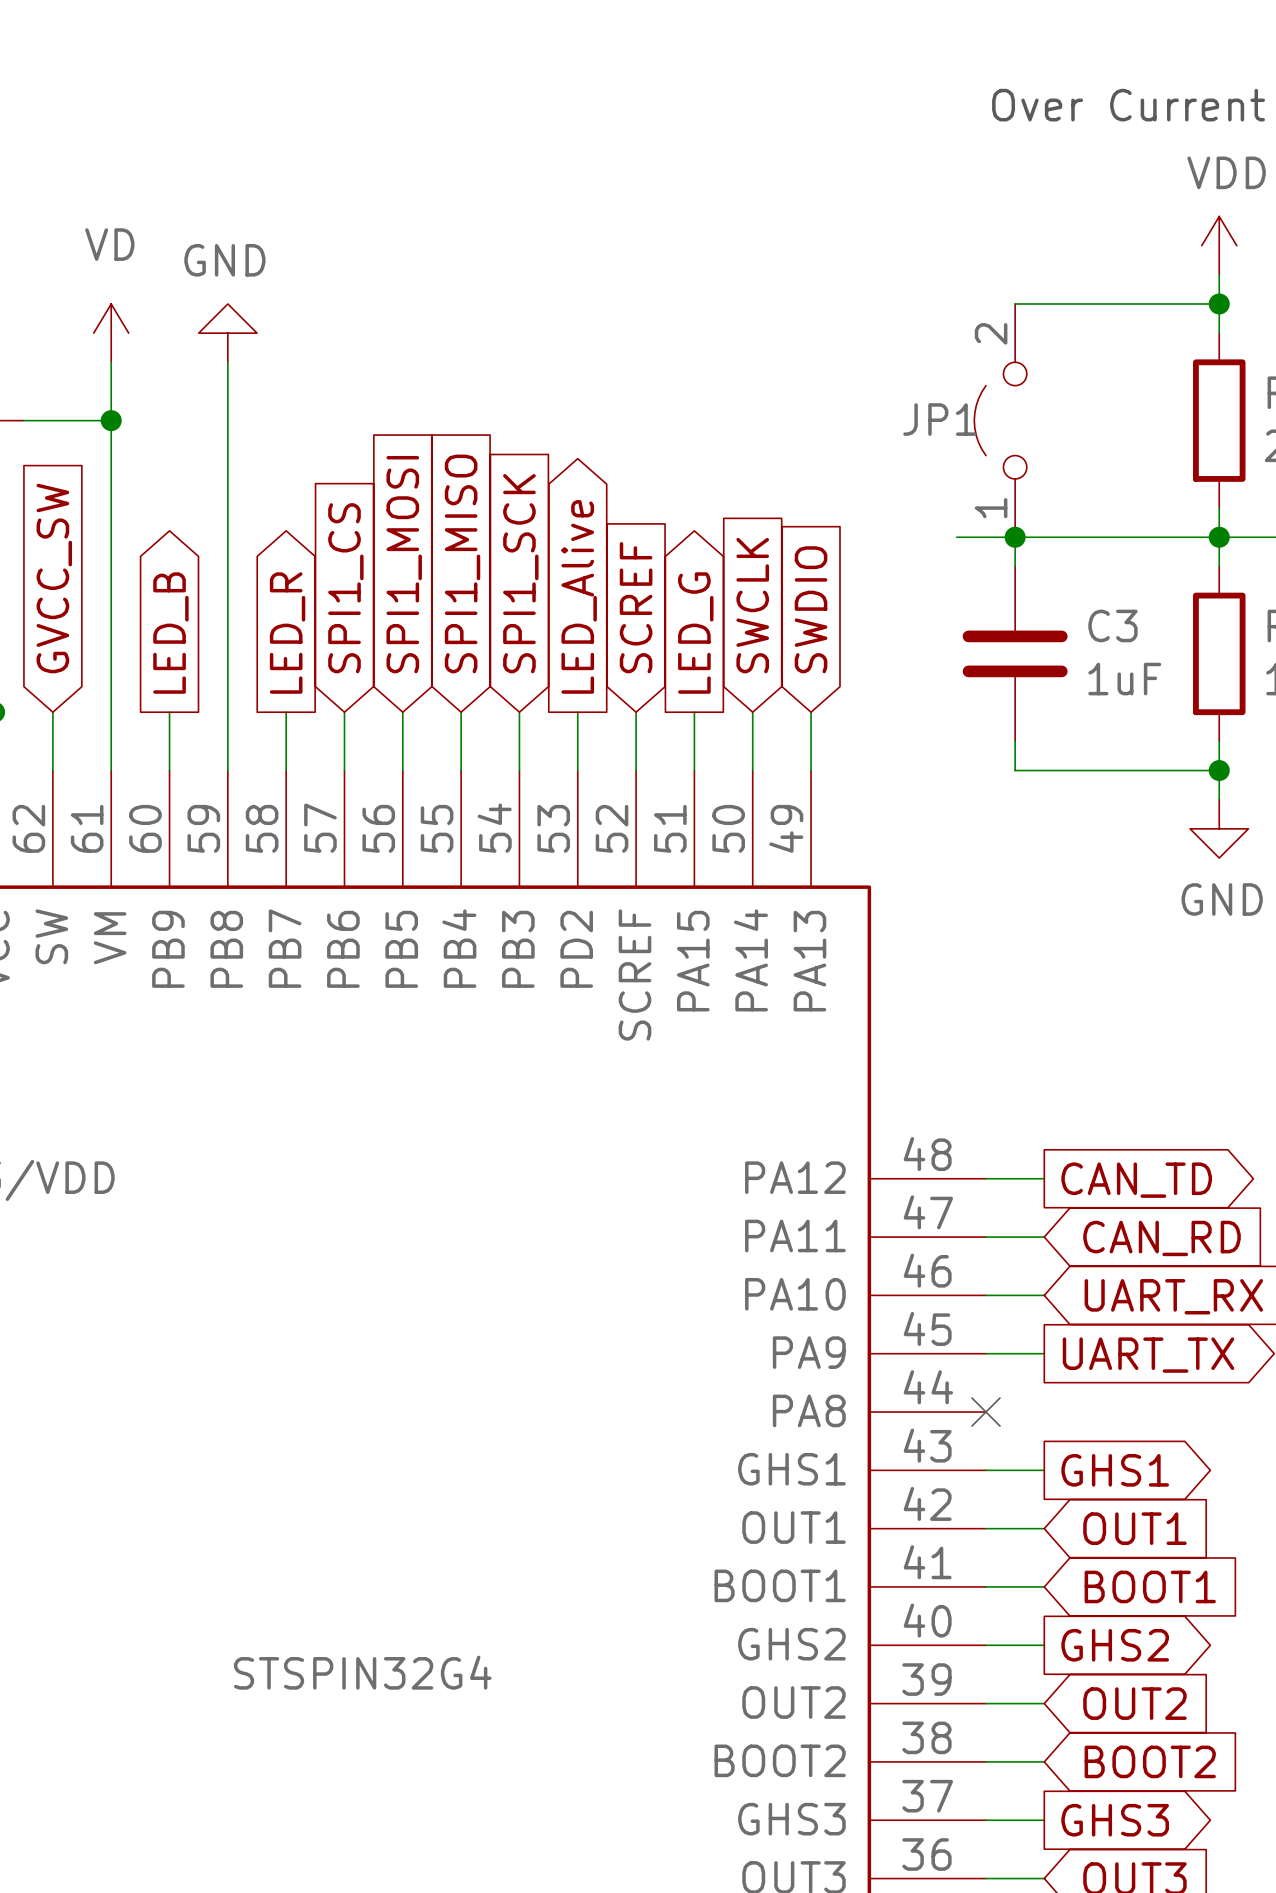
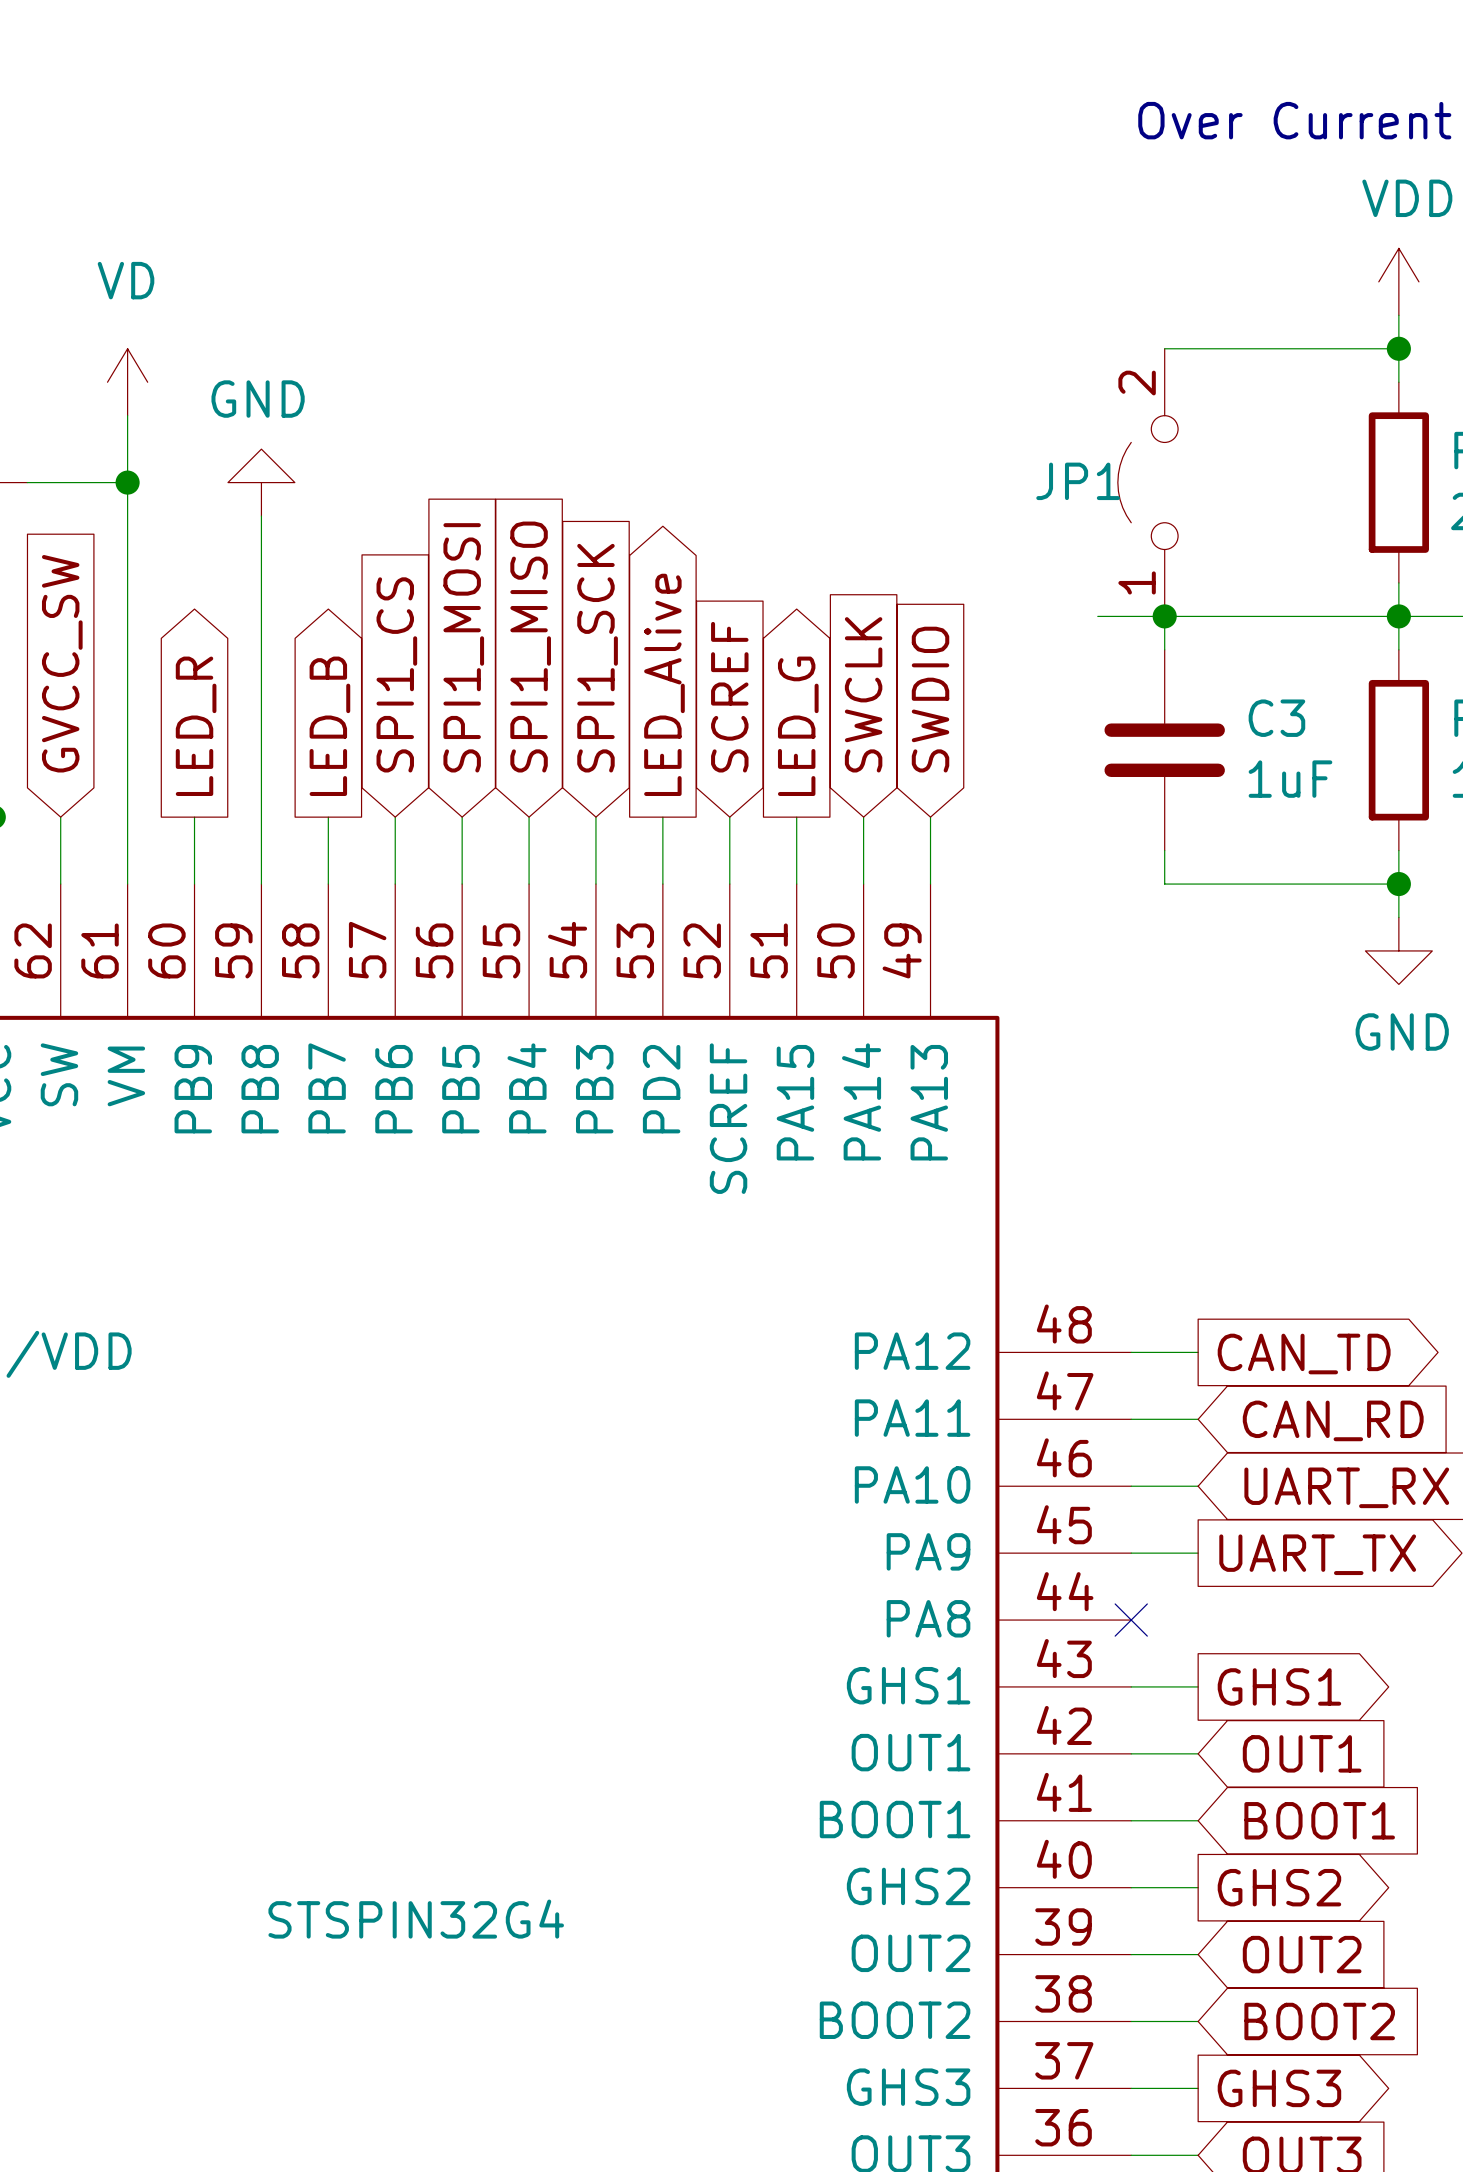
power symbol position: GND (227, 333) -> GND (261, 482)
wire: (227, 362) (227, 449) -> none
global label: LED_B (170, 633) -> LED_R (196, 726)
global label: LED_R (287, 633) -> LED_B (329, 726)

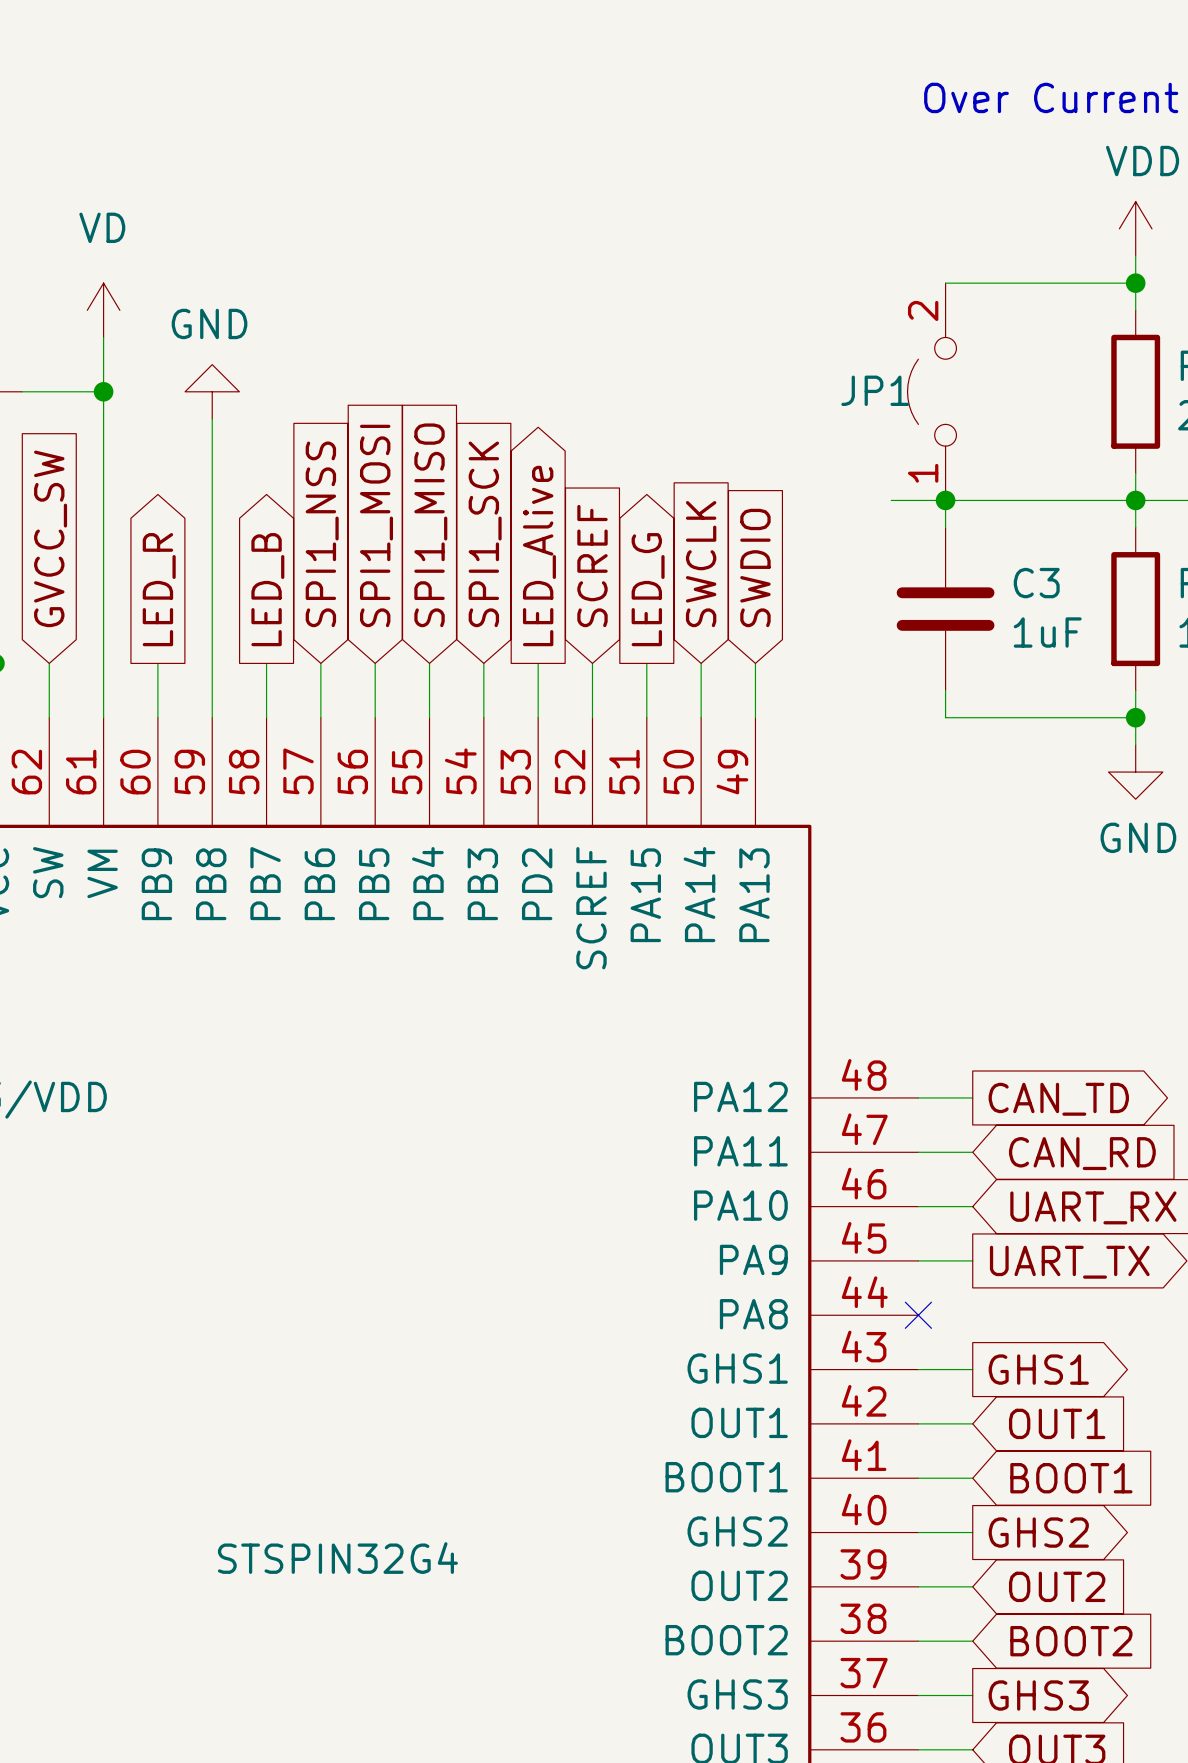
global label: SPI1_CS (396, 674) -> SPI1_NSS (322, 534)

